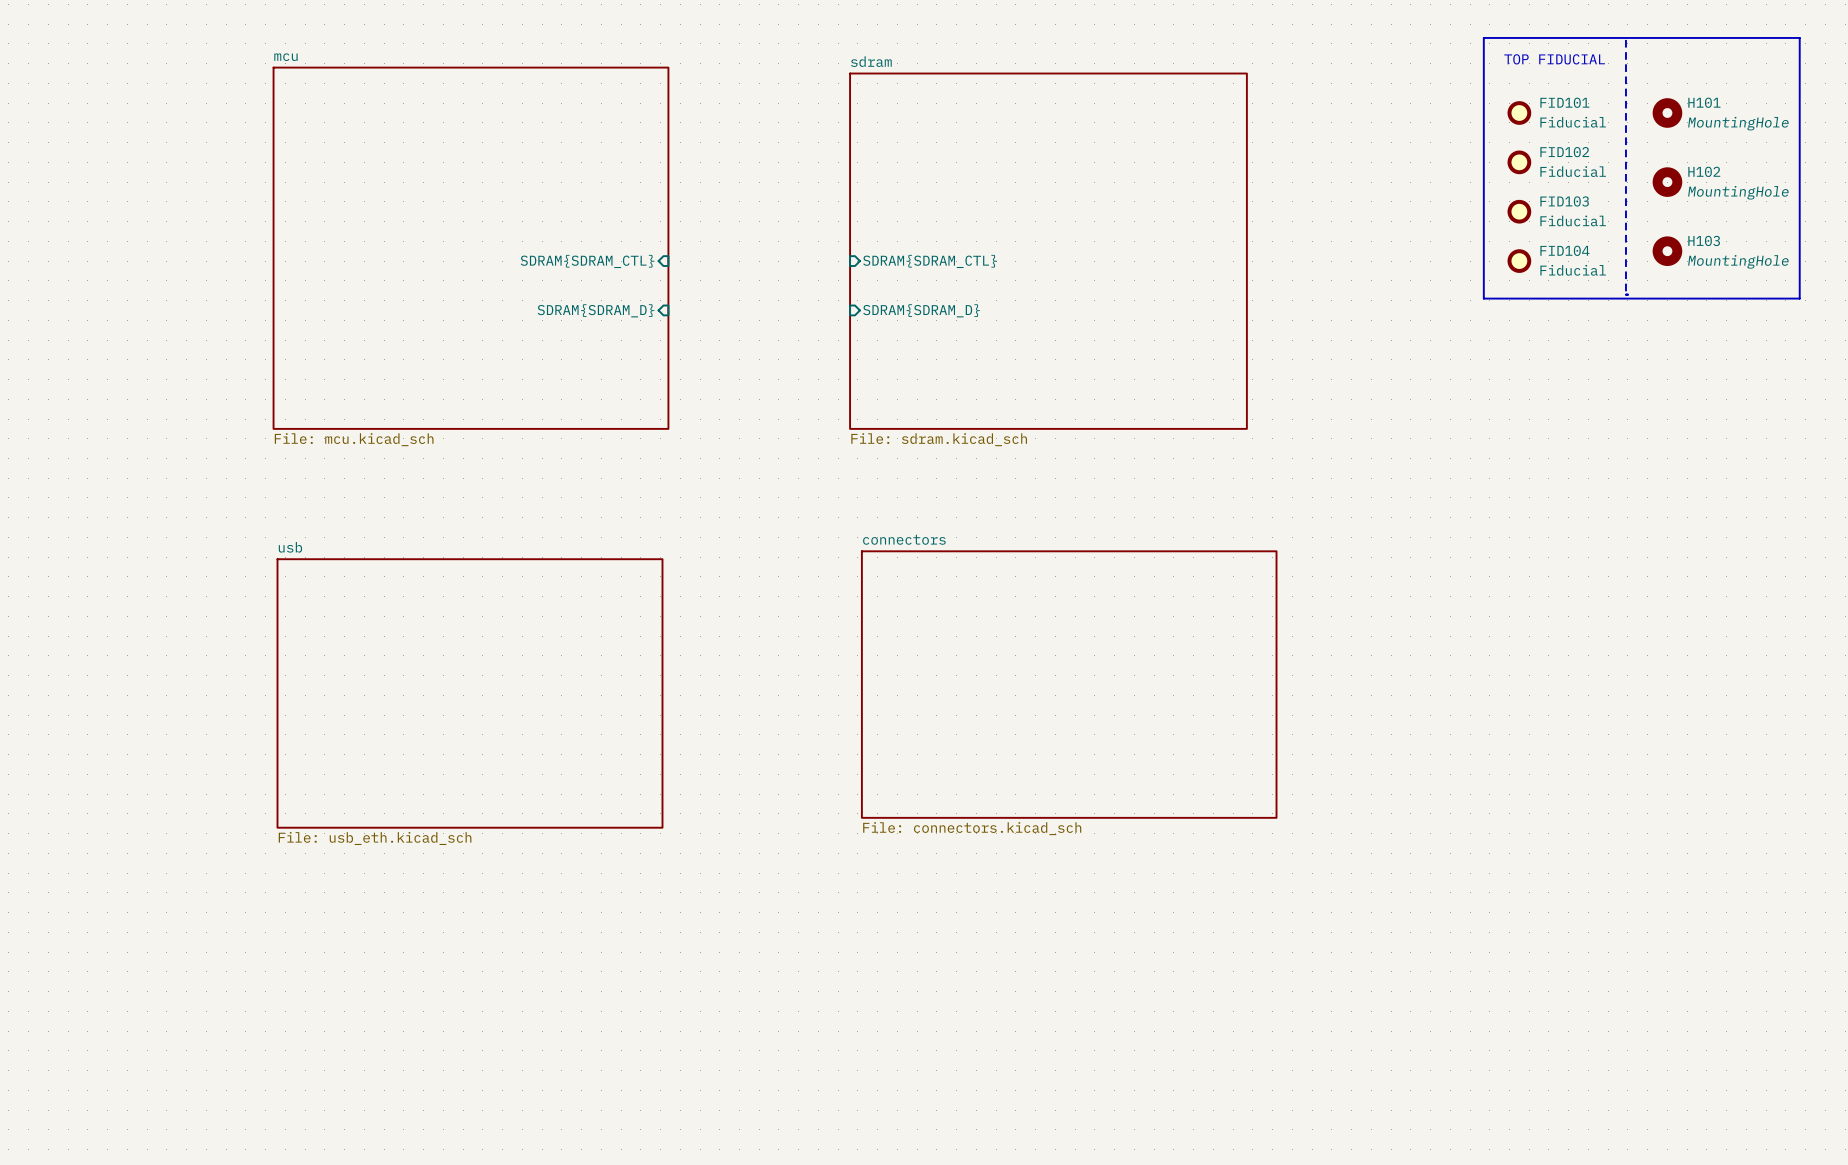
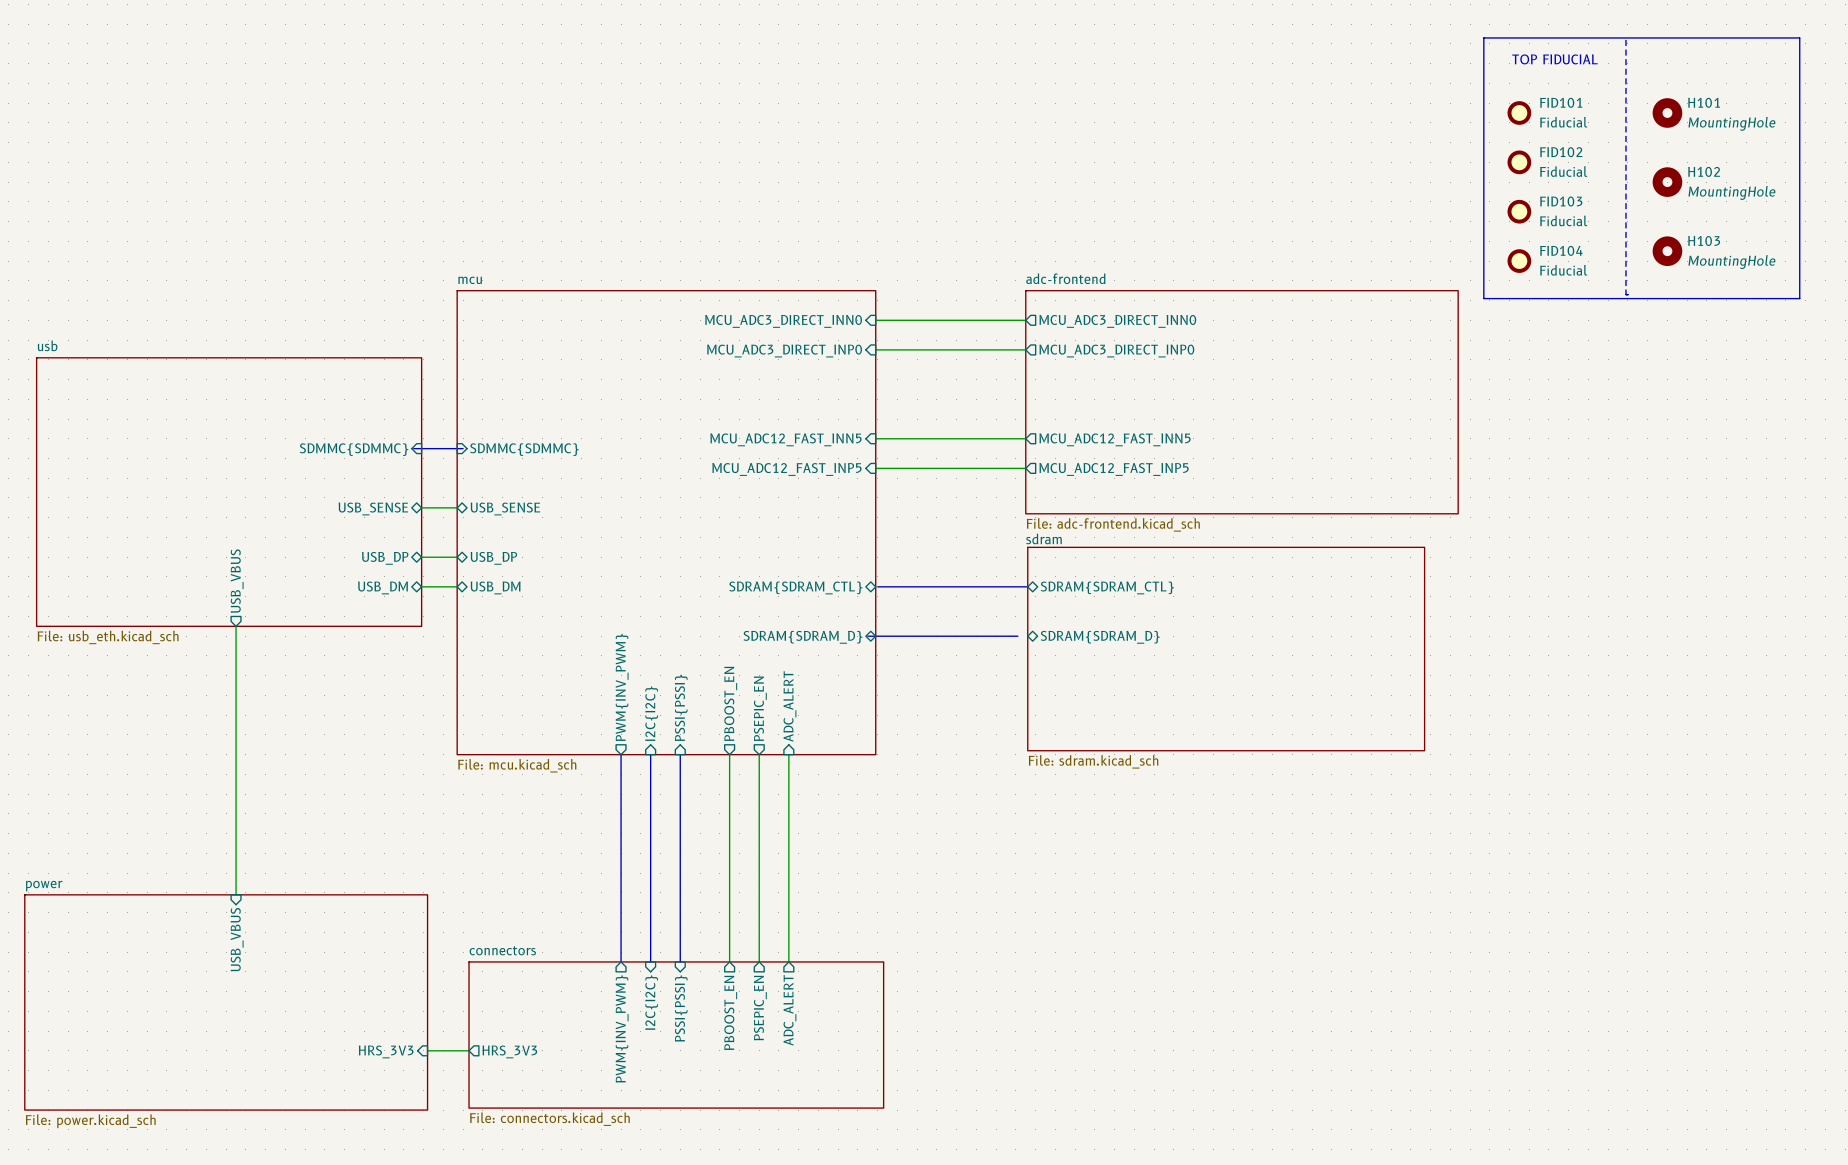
sheet mcu: File: mcu.kicad_sch (470, 248) -> none
sheet sdram: File: sdram.kicad_sch (1048, 251) -> none
sheet pin: SDRAM{SDRAM_CTL} (587, 261) -> none
sheet pin: SDRAM{SDRAM_CTL} (930, 261) -> none
sheet pin: SDRAM{SDRAM_D} (596, 310) -> none
sheet pin: SDRAM{SDRAM_D} (921, 310) -> none
wire: none -> (875, 320) (1025, 320)
sheet pin: none -> MCU_ADC3_DIRECT_INN0 (783, 321)
sheet pin: none -> MCU_ADC3_DIRECT_INN0 (1117, 321)
wire: none -> (875, 349) (1025, 349)
sheet pin: none -> MCU_ADC3_DIRECT_INP0 (784, 351)
sheet pin: none -> MCU_ADC3_DIRECT_INP0 (1116, 351)
sheet adc-frontend: none -> File: adc-frontend.kicad_sch (1241, 402)
wire: none -> (875, 438) (1025, 438)
sheet pin: none -> MCU_ADC12_FAST_INN5 (785, 439)
sheet pin: none -> MCU_ADC12_FAST_INN5 (1115, 439)
sheet pin: none -> SDMMC{SDMMC} (354, 449)
bus: none -> (413, 448) (463, 448)
sheet pin: none -> SDMMC{SDMMC} (524, 449)
wire: none -> (875, 468) (1025, 468)
sheet pin: none -> MCU_ADC12_FAST_INP5 (786, 469)
sheet pin: none -> MCU_ADC12_FAST_INP5 (1114, 469)
sheet usb: none -> File: usb_eth.kicad_sch (229, 492)
wire: none -> (421, 507) (457, 507)
sheet pin: none -> USB_SENSE (373, 508)
sheet pin: none -> USB_SENSE (505, 508)
sheet mcu: none -> File: mcu.kicad_sch (666, 522)
sheet pin: none -> USB_DP (385, 558)
wire: none -> (421, 557) (457, 557)
sheet pin: none -> USB_DP (493, 558)
sheet pin: none -> USB_VBUS (237, 581)
wire: none -> (421, 586) (457, 586)
bus: none -> (877, 586) (1027, 586)
sheet pin: none -> USB_DM (382, 587)
sheet pin: none -> USB_DM (495, 587)
sheet pin: none -> SDRAM{SDRAM_CTL} (795, 587)
sheet pin: none -> SDRAM{SDRAM_CTL} (1107, 587)
wire: none -> (236, 626) (236, 894)
sheet pin: none -> SDRAM{SDRAM_D} (802, 637)
bus: none -> (867, 636) (1017, 636)
sheet pin: none -> SDRAM{SDRAM_D} (1100, 637)
sheet sdram: none -> File: sdram.kicad_sch (1226, 649)
sheet connectors: File: connectors.kicad_sch (1069, 684) -> none
sheet pin: none -> PWM{INV_PWM} (622, 687)
sheet usb: File: usb_eth.kicad_sch (470, 693) -> none
sheet pin: none -> PSSI{PSSI} (681, 707)
sheet pin: none -> PBOOST_EN (730, 703)
sheet pin: none -> PSEPIC_EN (760, 708)
sheet pin: none -> ADC_ALERT (789, 706)
sheet pin: none -> I2C{I2C} (651, 713)
bus: none -> (621, 754) (621, 961)
bus: none -> (650, 754) (650, 961)
bus: none -> (680, 754) (680, 961)
wire: none -> (729, 754) (729, 961)
wire: none -> (759, 754) (759, 961)
wire: none -> (788, 754) (788, 961)
sheet pin: none -> USB_VBUS (237, 939)
sheet power: none -> File: power.kicad_sch (226, 1002)
sheet pin: none -> I2C{I2C} (651, 1002)
sheet pin: none -> PBOOST_EN (730, 1012)
sheet pin: none -> PSEPIC_EN (760, 1008)
sheet pin: none -> ADC_ALERT (789, 1010)
sheet pin: none -> PSSI{PSSI} (681, 1008)
sheet pin: none -> PWM{INV_PWM} (622, 1028)
sheet connectors: none -> File: connectors.kicad_sch (676, 1035)
wire: none -> (427, 1050) (469, 1050)
sheet pin: none -> HRS_3V3 (386, 1051)
sheet pin: none -> HRS_3V3 (509, 1051)

